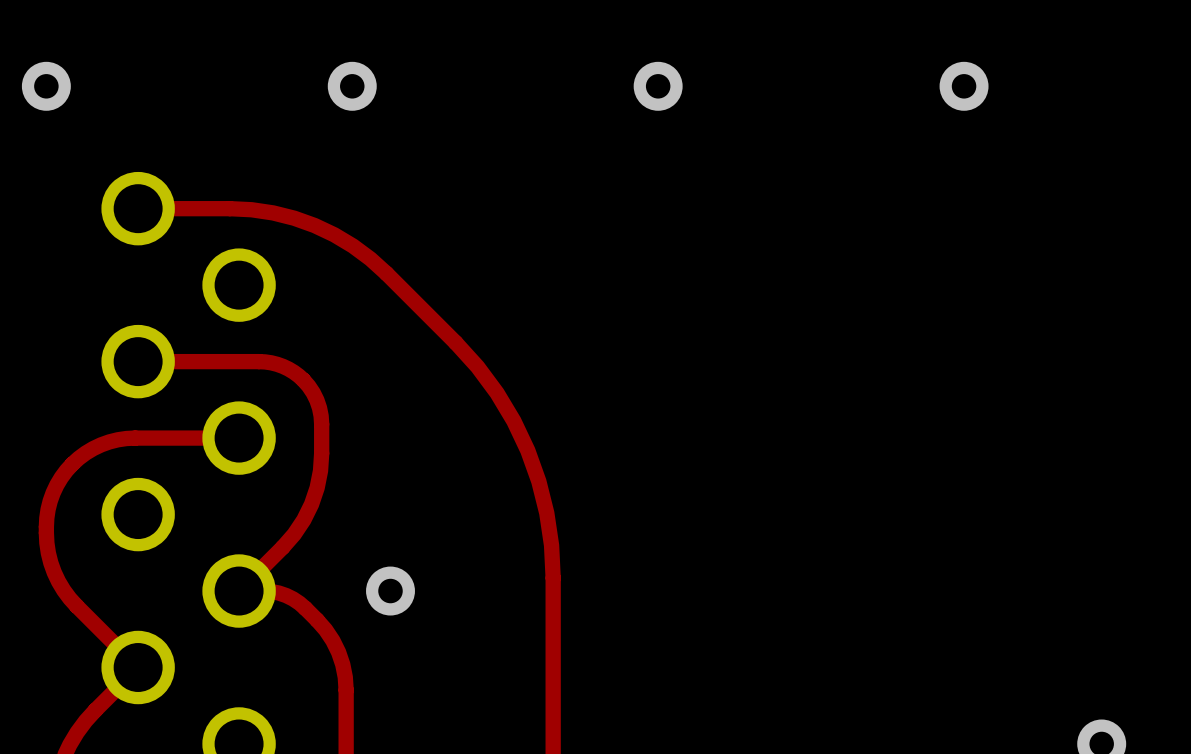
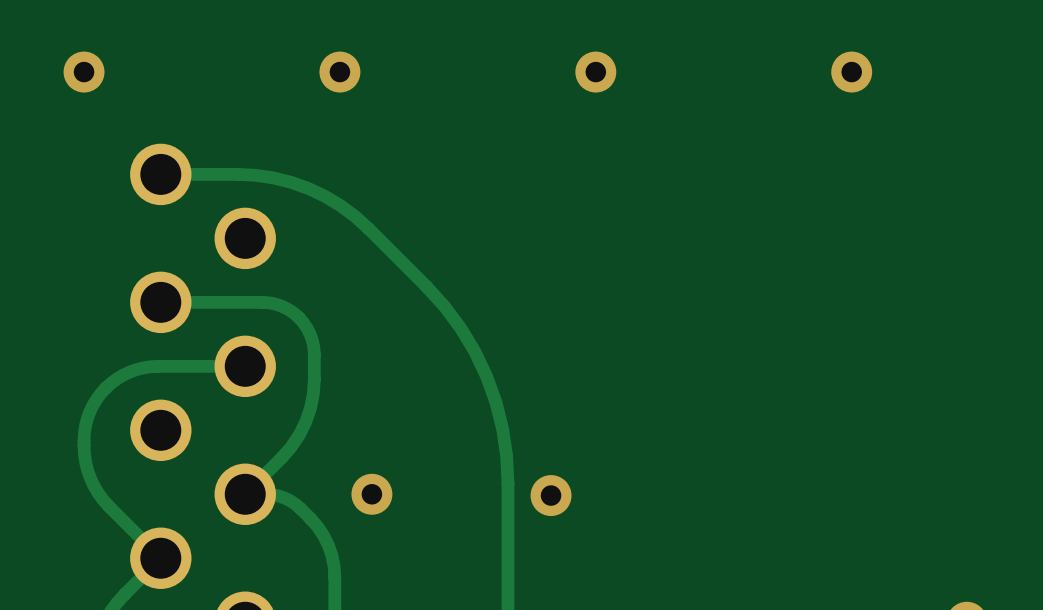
via: none -> (551, 495)

